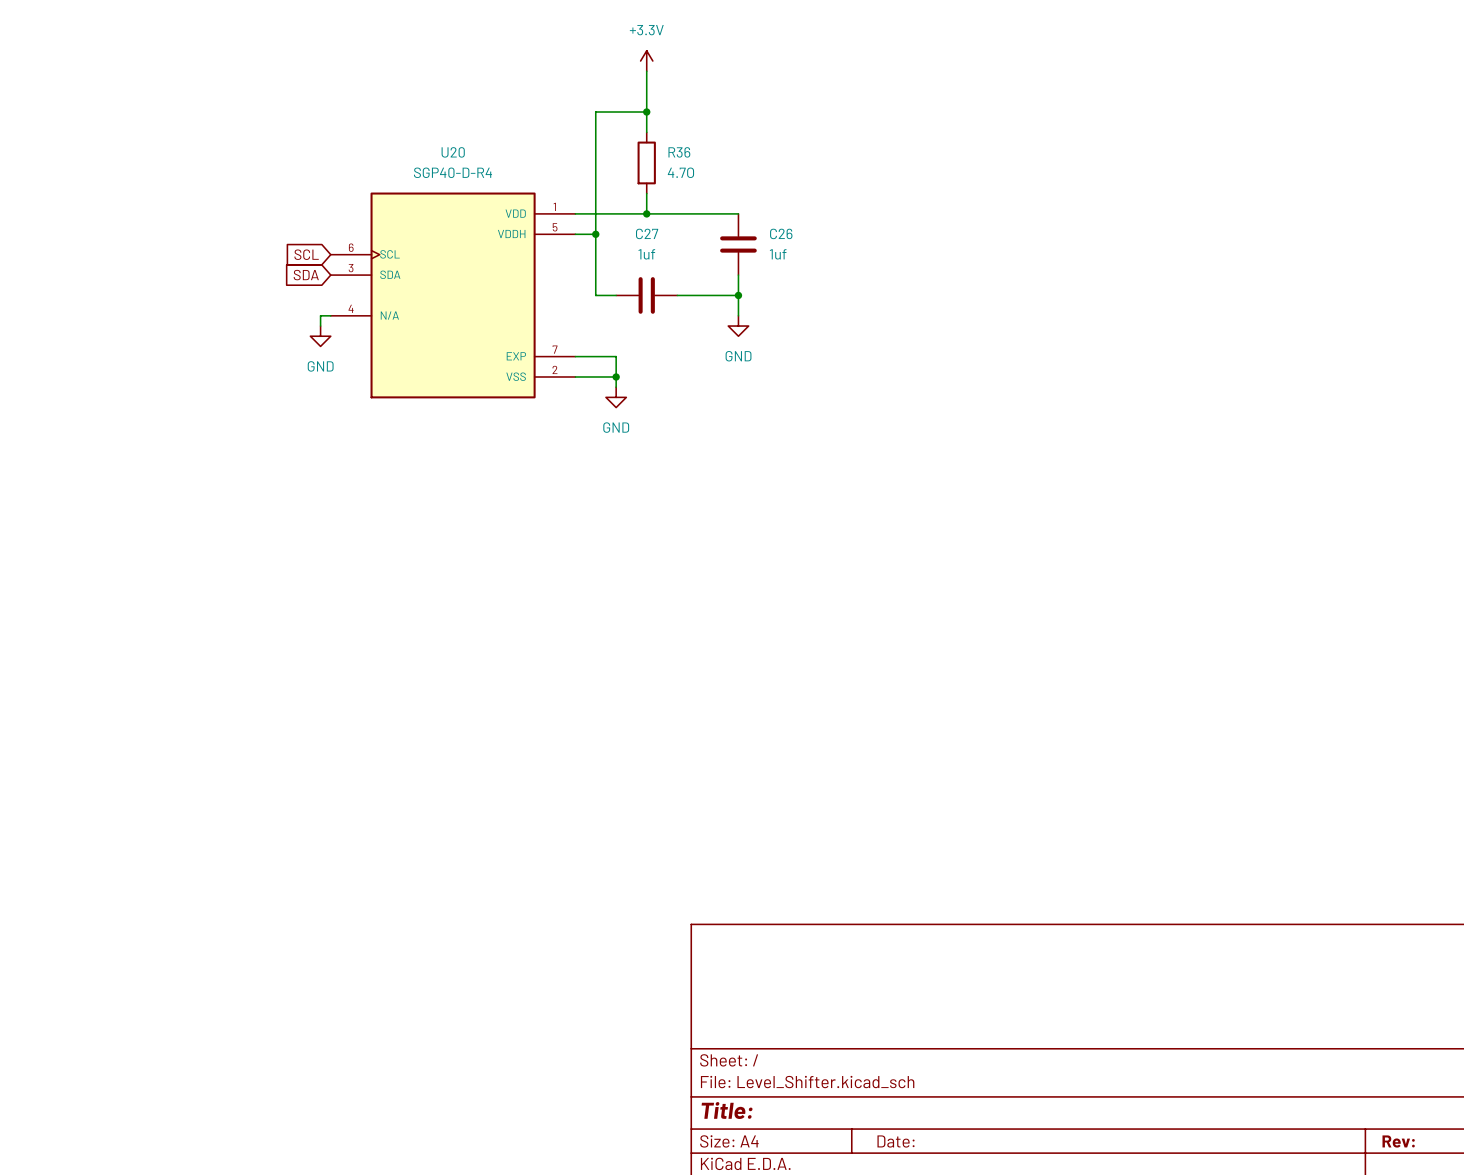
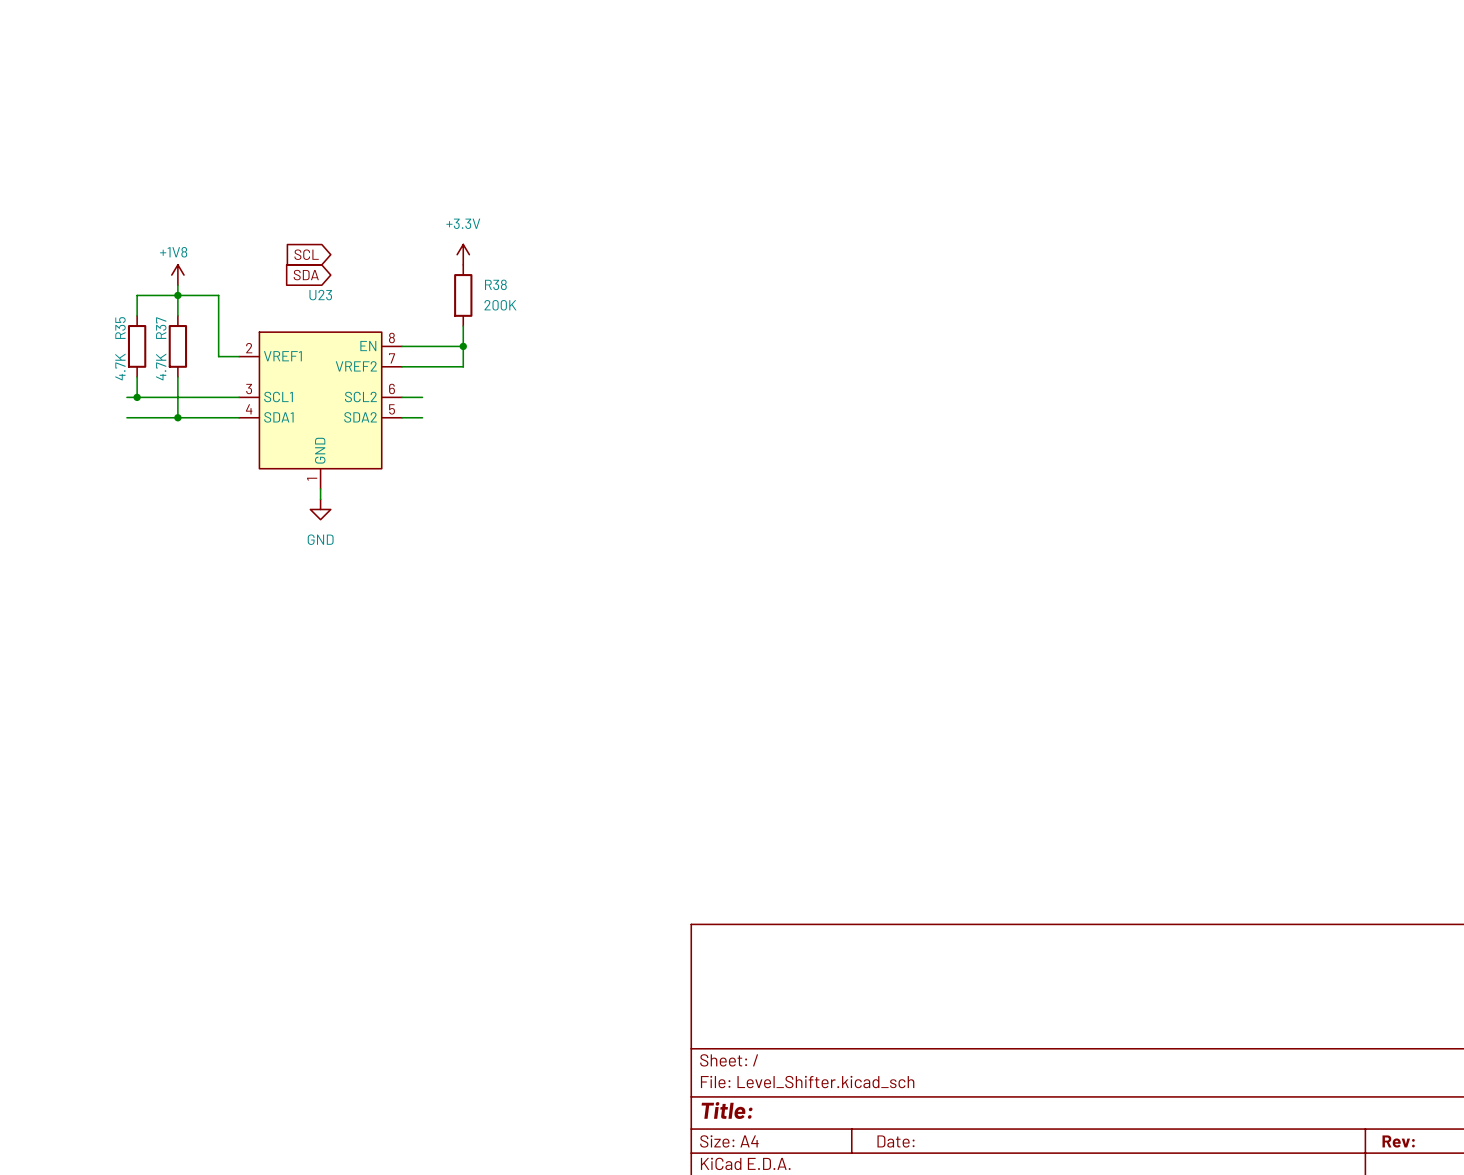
power symbol: +3.3V (646, 61) -> none
wire: (646, 71) (646, 132) -> none
wire: (646, 112) (595, 112) (595, 295) (616, 295) -> none
junction: (646, 112) -> none
R36: 4.7O (646, 162) -> none
wire: (646, 193) (646, 213) -> none
wire: (575, 213) (738, 213) -> none
junction: (646, 213) -> none
wire: (575, 234) (595, 234) -> none
junction: (595, 234) -> none
C26: 1uf (738, 244) -> none
power symbol: none -> +3.3V (463, 254)
power symbol: none -> +1V8 (177, 275)
wire: (738, 275) (738, 315) -> none
wire: none -> (177, 285) (177, 315)
junction: none -> (177, 295)
U20: SGP40-D-R4 (453, 295) -> none
R38: none -> 200K (463, 295)
C27: 1uf (646, 295) -> none
wire: (677, 295) (738, 295) -> none
junction: (738, 295) -> none
wire: none -> (137, 315) (137, 295) (218, 295) (218, 356) (239, 356)
wire: (330, 315) (320, 315) (320, 326) -> none
power symbol: GND (738, 326) -> none
power symbol: GND (320, 336) -> none
R35: none -> 4.7K (137, 346)
R37: none -> 4.7K (177, 346)
junction: none -> (463, 346)
wire: (575, 356) (616, 356) (616, 387) -> none
wire: none -> (137, 376) (137, 397)
wire: none -> (177, 376) (177, 417)
wire: (575, 376) (616, 376) -> none
junction: (616, 376) -> none
wire: none -> (126, 397) (239, 397)
junction: none -> (137, 397)
power symbol: GND (616, 397) -> none
U23: none -> (320, 410)
wire: none -> (126, 417) (239, 417)
junction: none -> (177, 417)
wire: none -> (402, 417) (422, 417)
wire: none -> (320, 489) (320, 499)
power symbol: none -> GND (320, 509)

